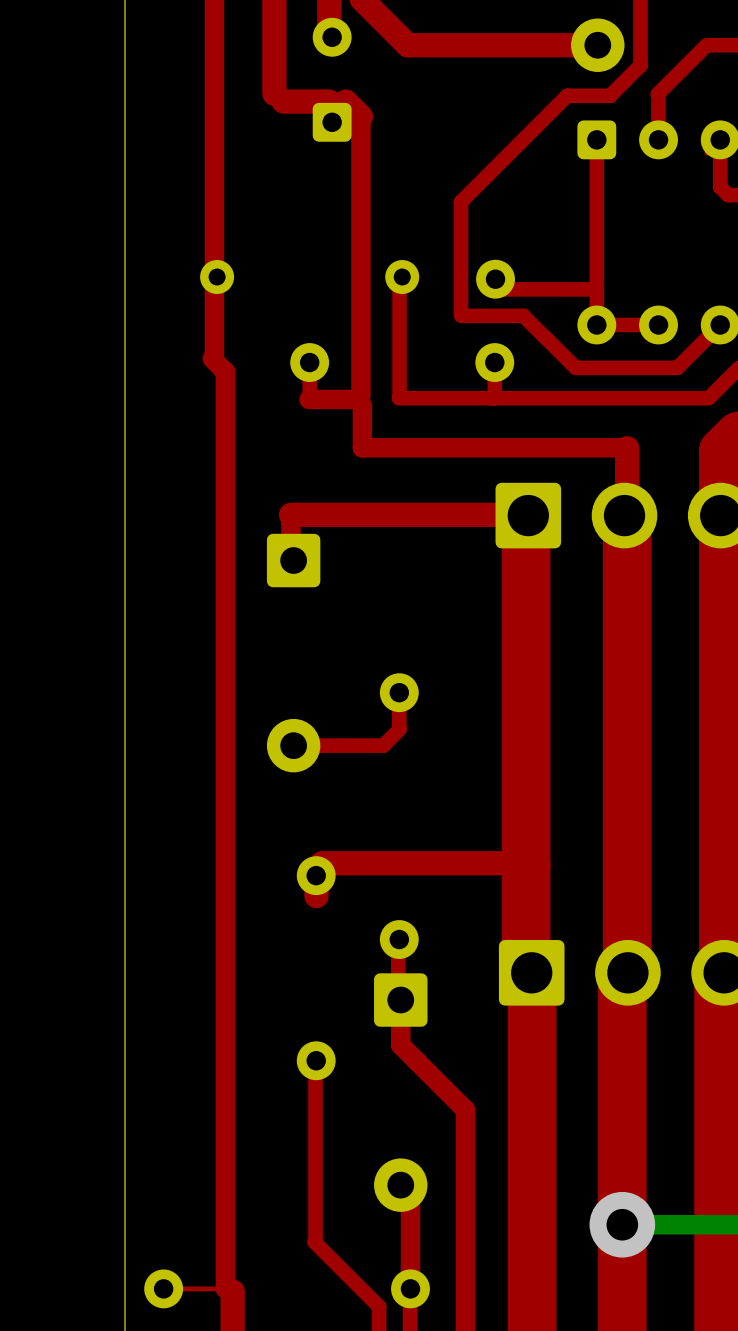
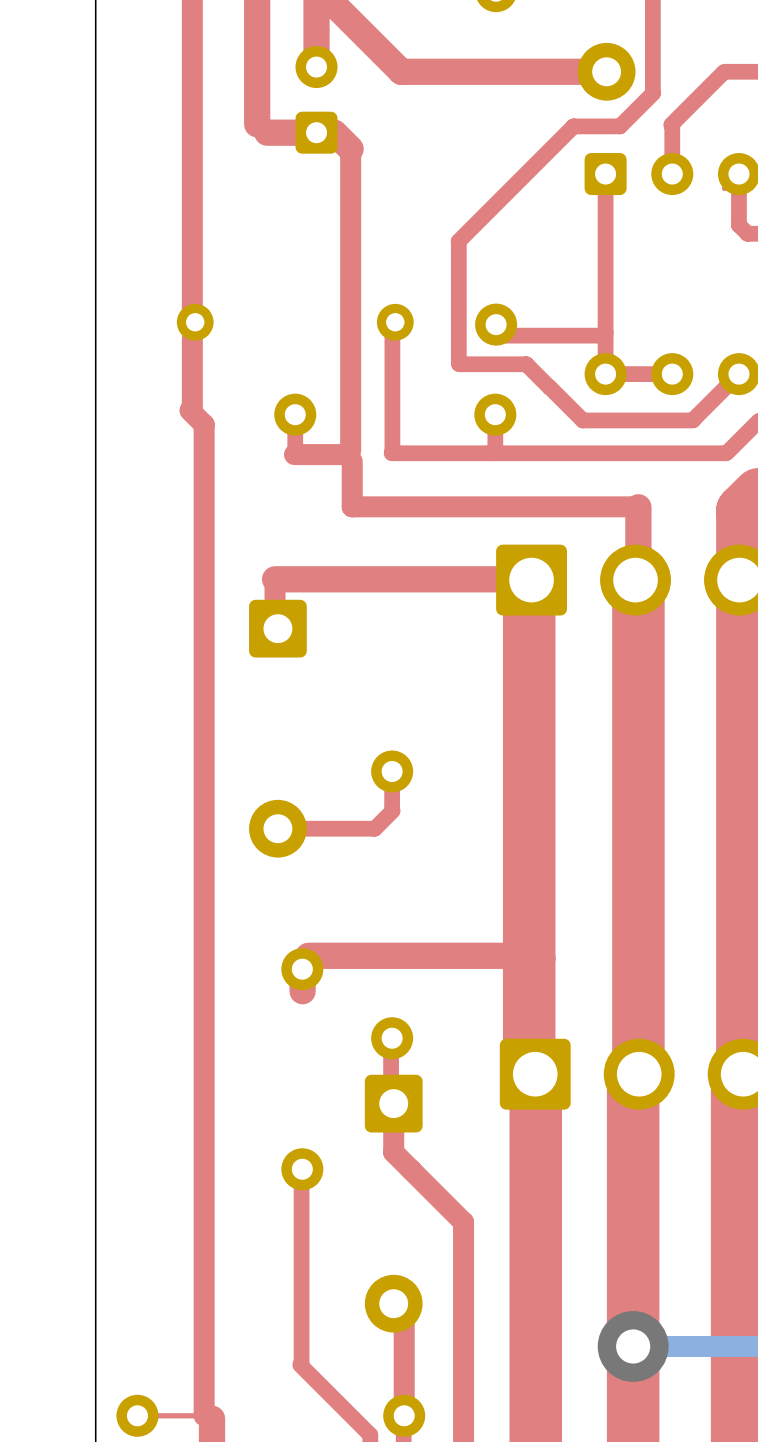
part footprint: [312, 17, 352, 142] -> [295, 46, 338, 154]

